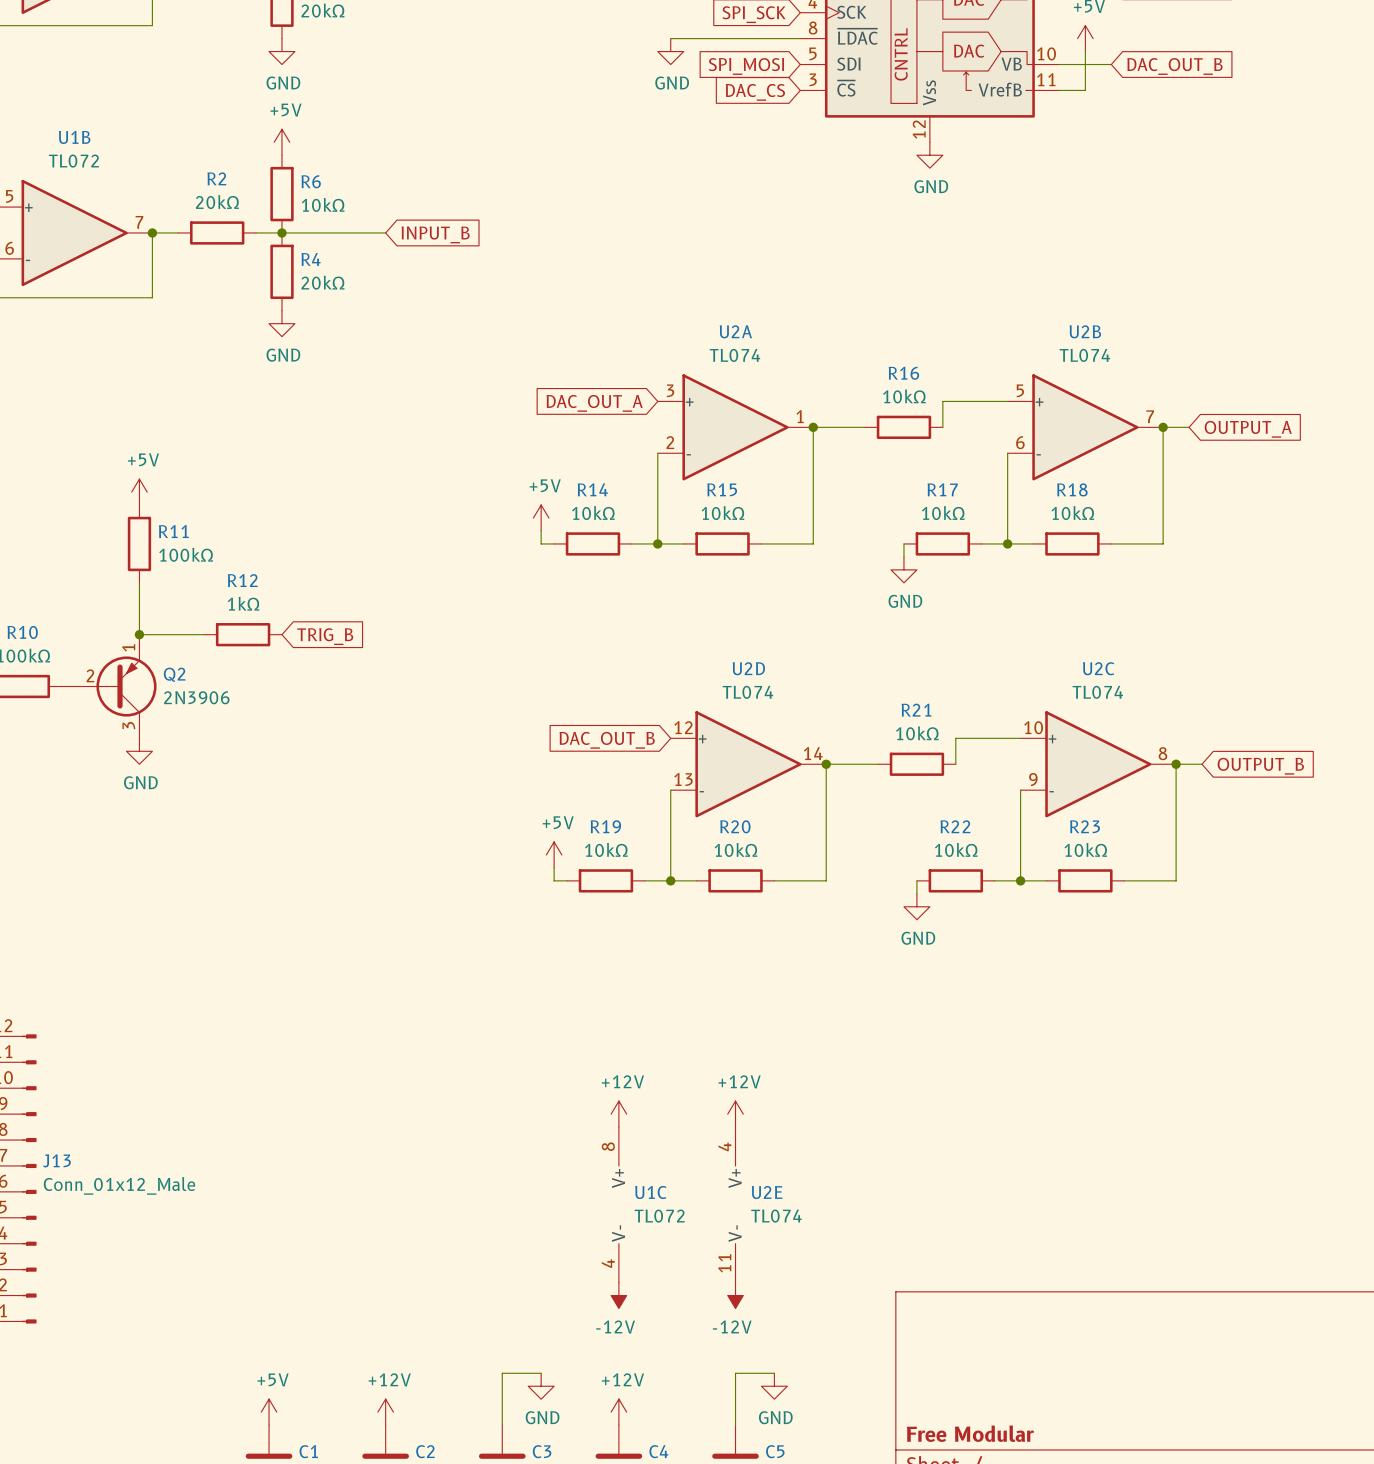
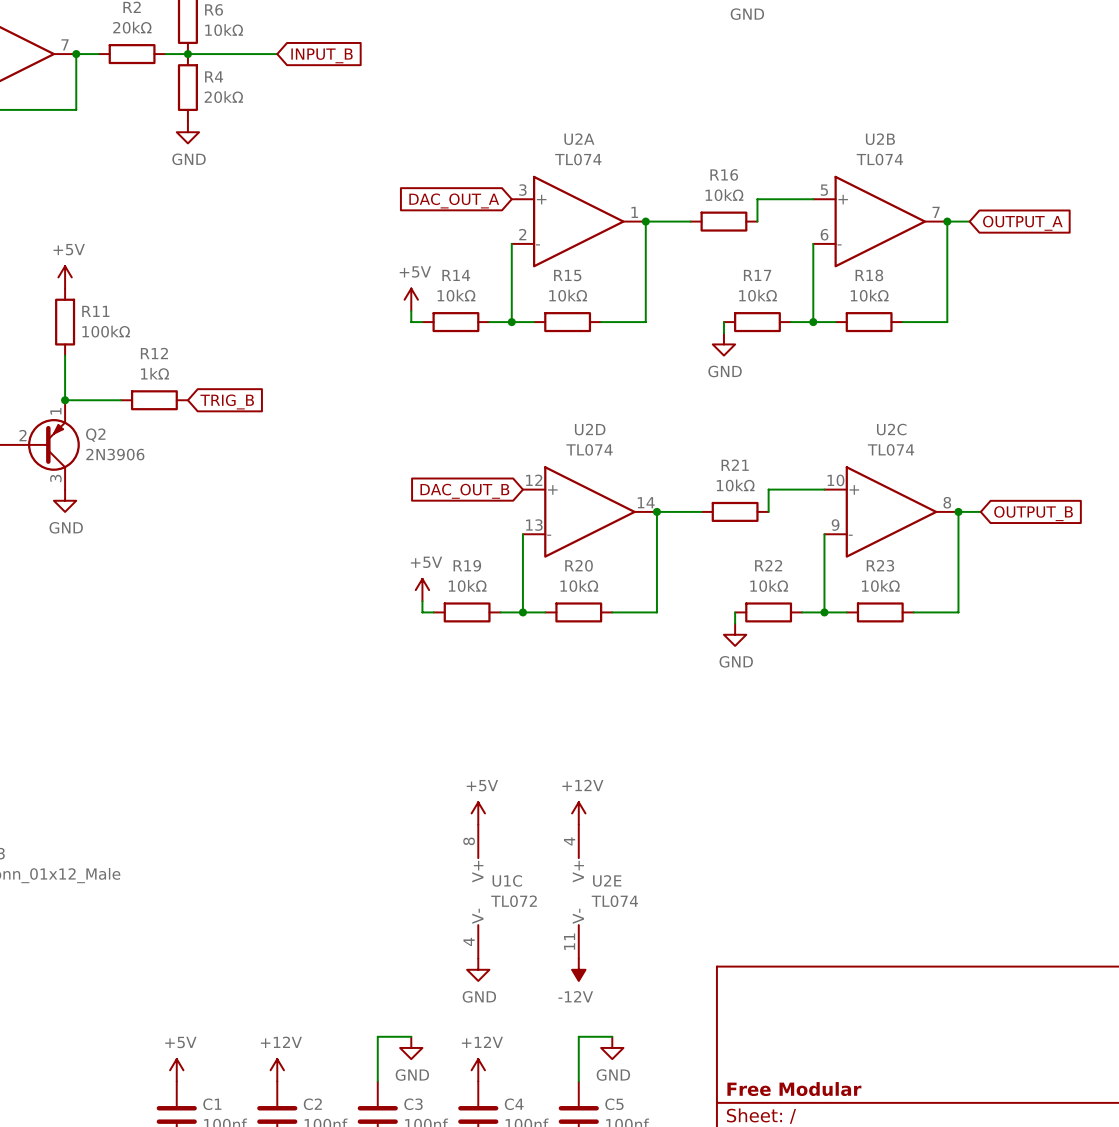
power symbol: +12V (618, 1114) -> +5V (478, 813)
power symbol: -12V (618, 1295) -> GND (478, 969)

